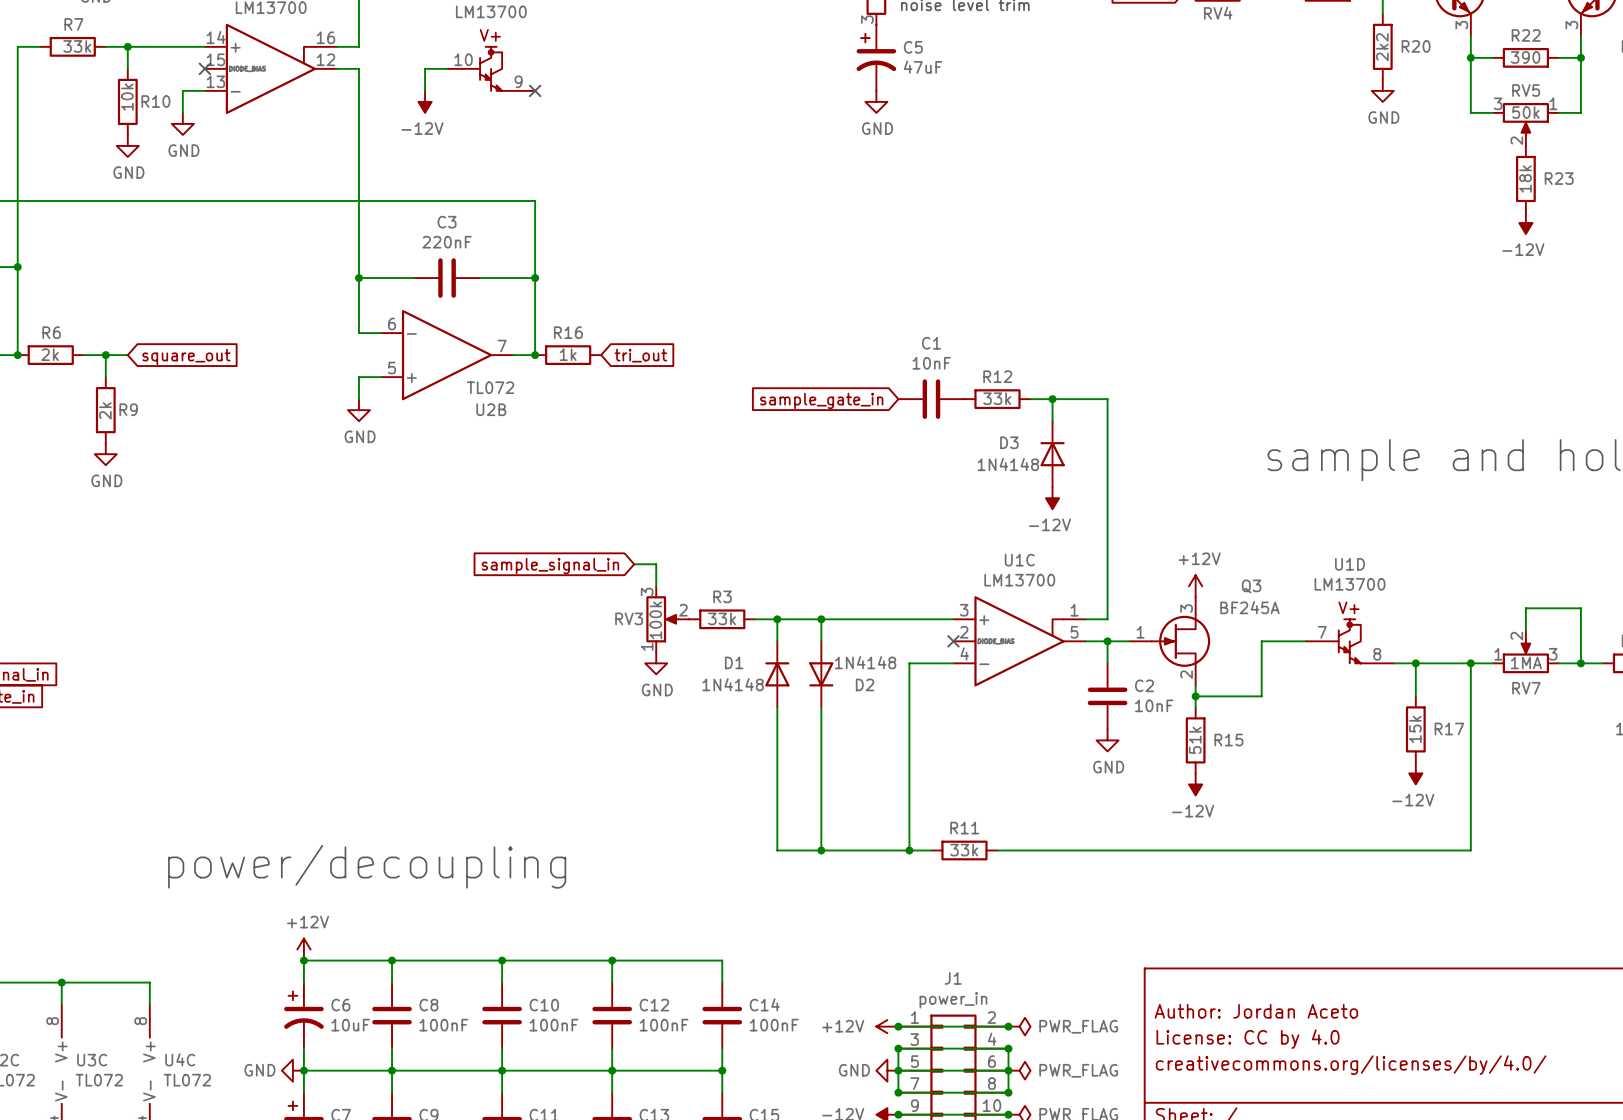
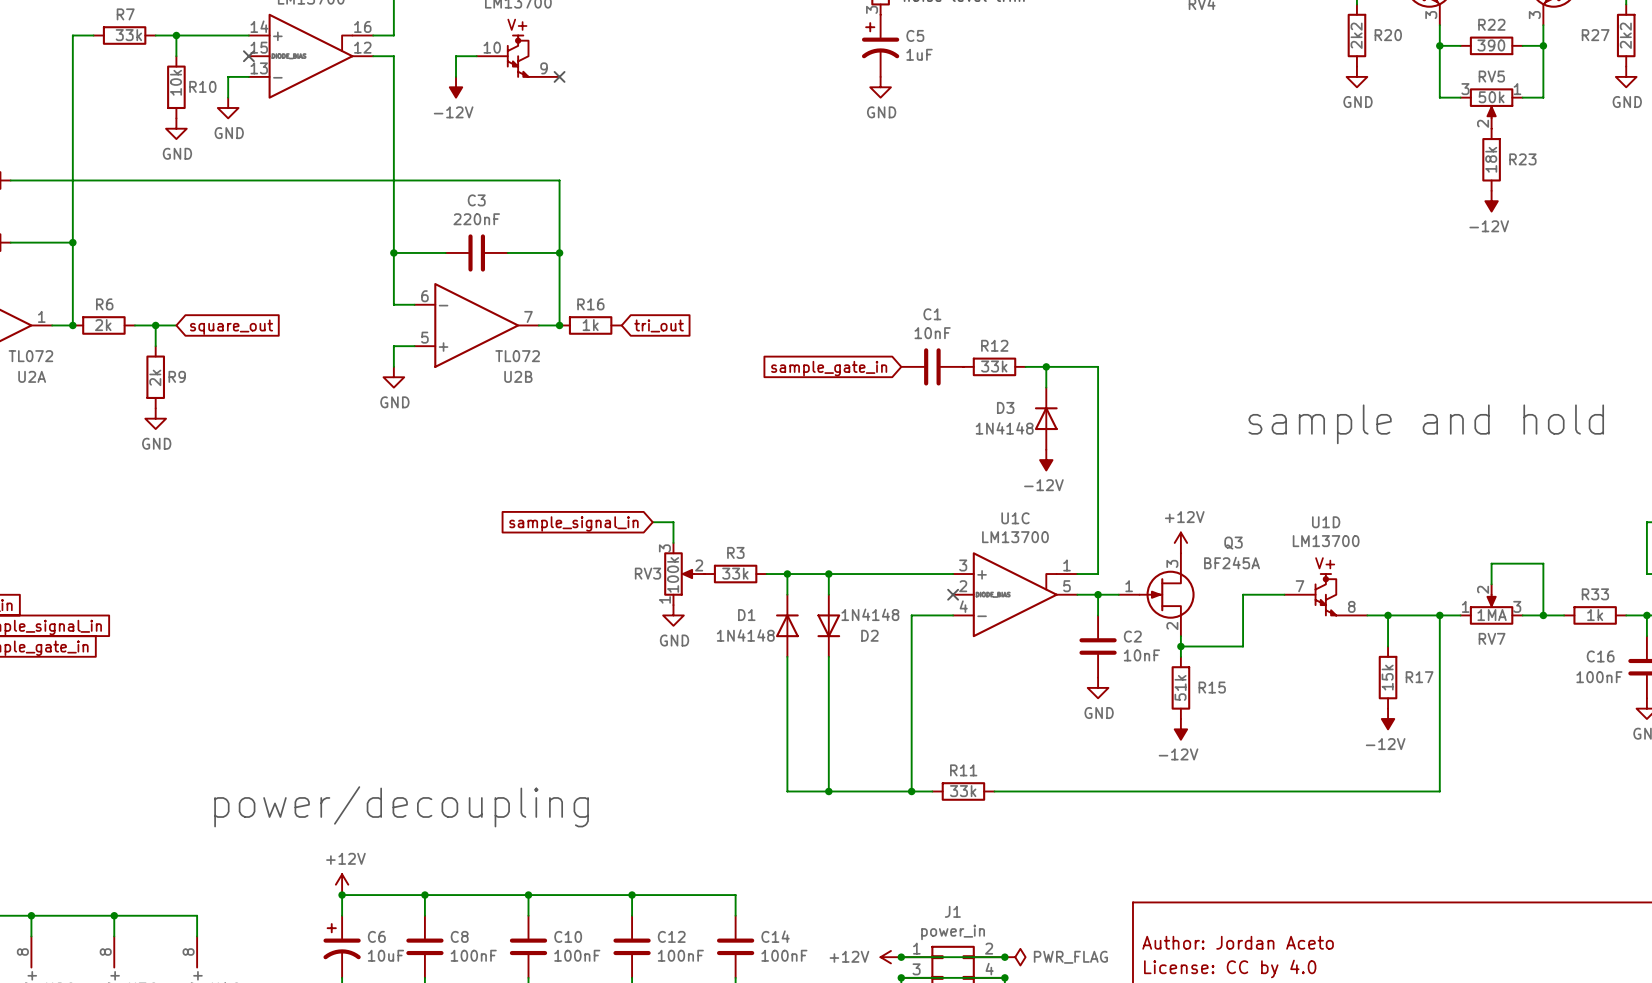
C5 value: 47uF (923, 67) -> 1uF (919, 54)

